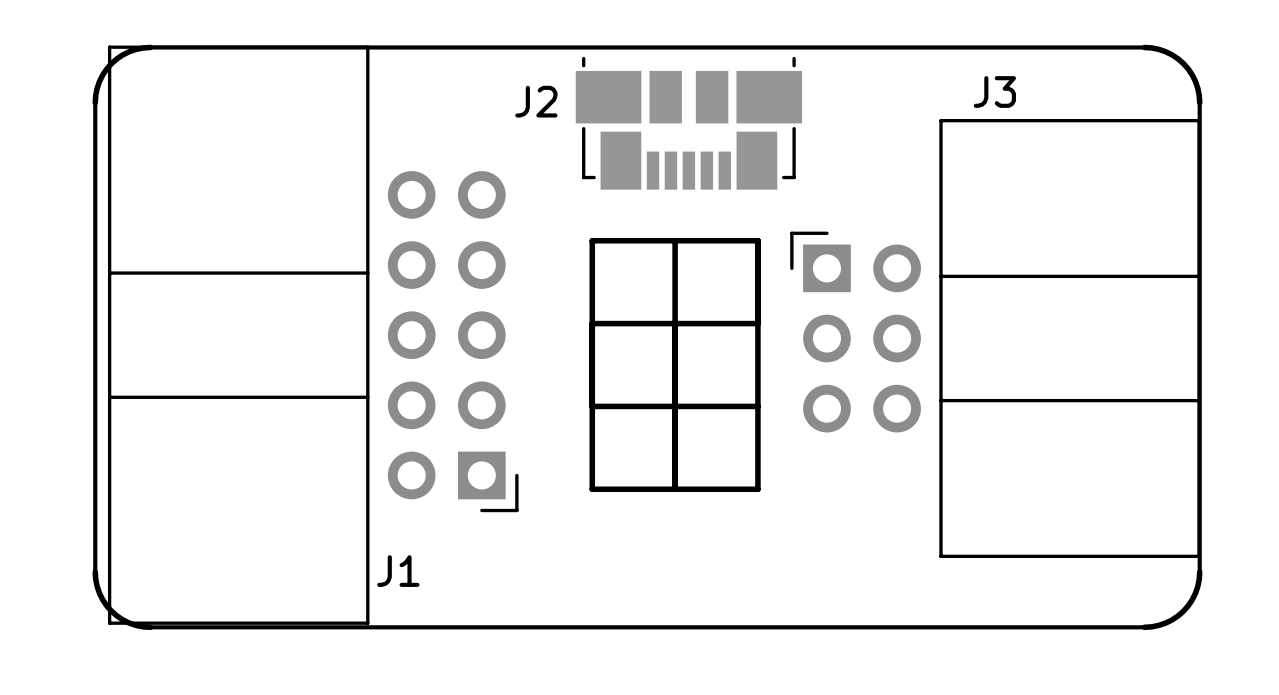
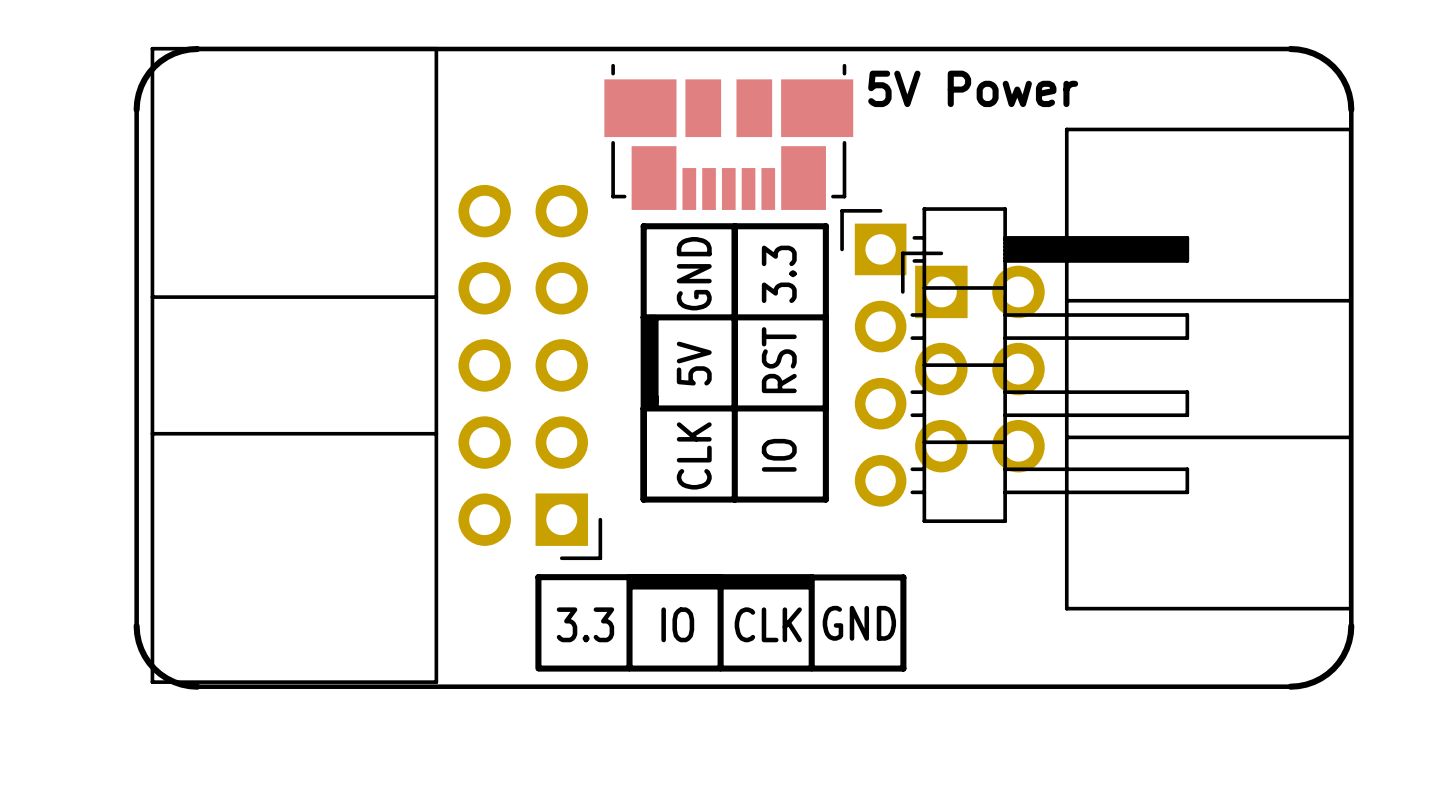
text: none -> 5V Power (973, 88)
J3 name: J3 (994, 92) -> none
J2: (688, 123) -> none
part: none -> (728, 136)
line: (592, 240) (592, 489) (757, 489) (757, 240) (592, 240) -> (643, 226) (643, 499) (825, 499) (825, 226) (643, 226)
line: (675, 240) (675, 489) -> (734, 226) (734, 499)
text: none -> GND (694, 273)
text: none -> 3.3 (779, 274)
line: (592, 323) (757, 323) -> (643, 317) (825, 317)
text: none -> RST (779, 360)
text: none -> 5V (694, 363)
part: none -> (1014, 365)
line: none -> (649, 402) (649, 317) (655, 317) (655, 406) (646, 406)
line: (592, 406) (757, 406) -> (643, 408) (825, 408)
text: none -> IO (779, 455)
text: none -> CLK (694, 455)
line: none -> (629, 577) (629, 668)
line: none -> (720, 577) (720, 668)
line: none -> (812, 577) (903, 577) (903, 668) (539, 668)
line: none -> (630, 581) (810, 581) (810, 586) (630, 586)
text: none -> GND (859, 623)
J1 name: J1 (398, 571) -> none
text: none -> 3.3 (585, 624)
text: none -> IO (677, 624)
text: none -> CLK (768, 624)
line: none -> (538, 668) (538, 577) (811, 577) (811, 668)

